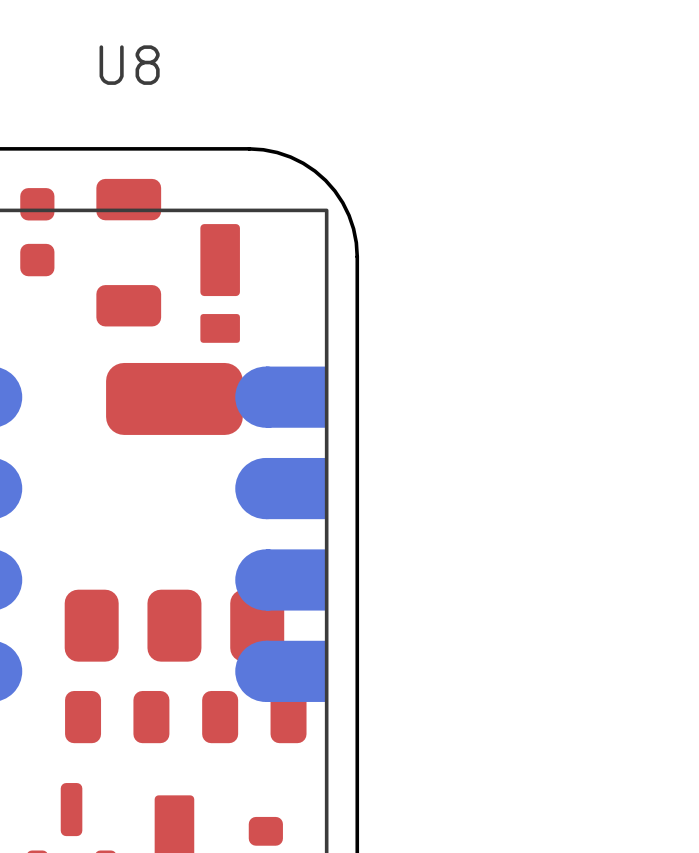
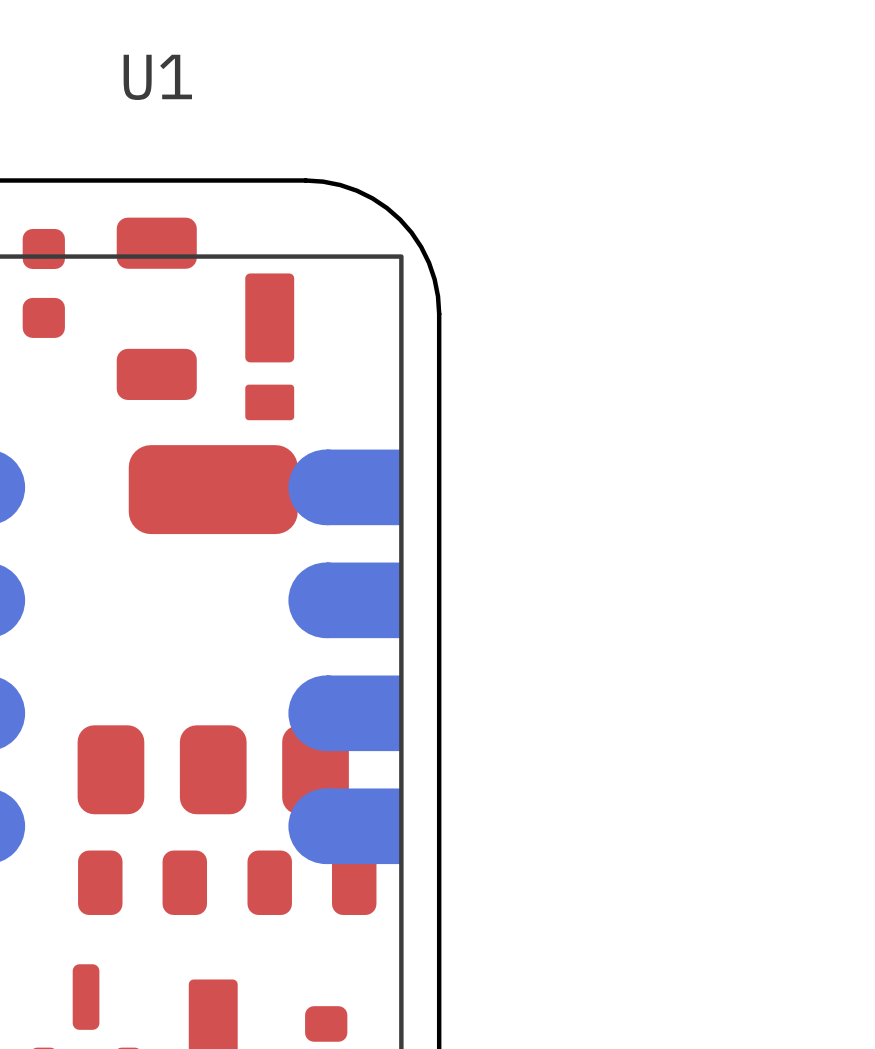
U8 name: U8 (129, 65) -> U1 (157, 77)

